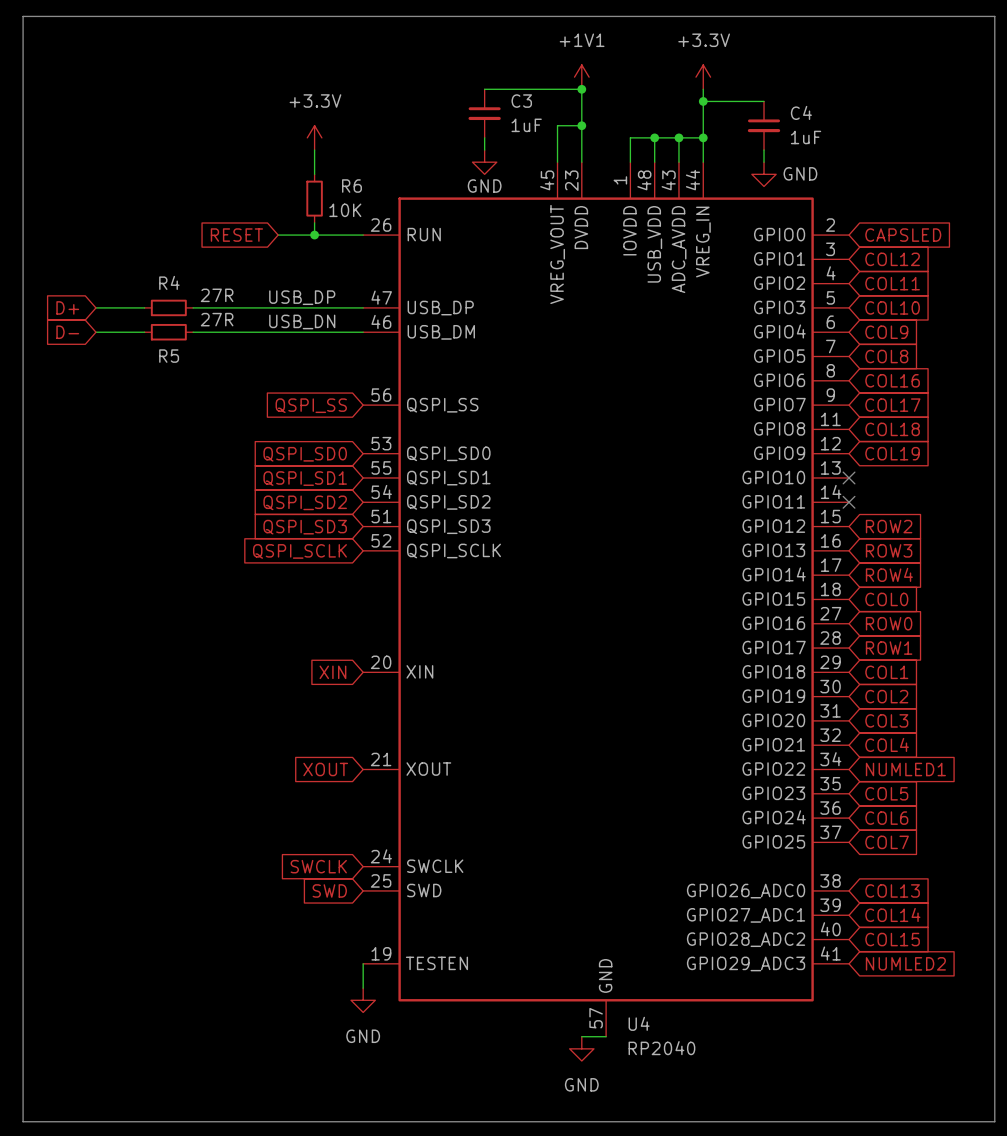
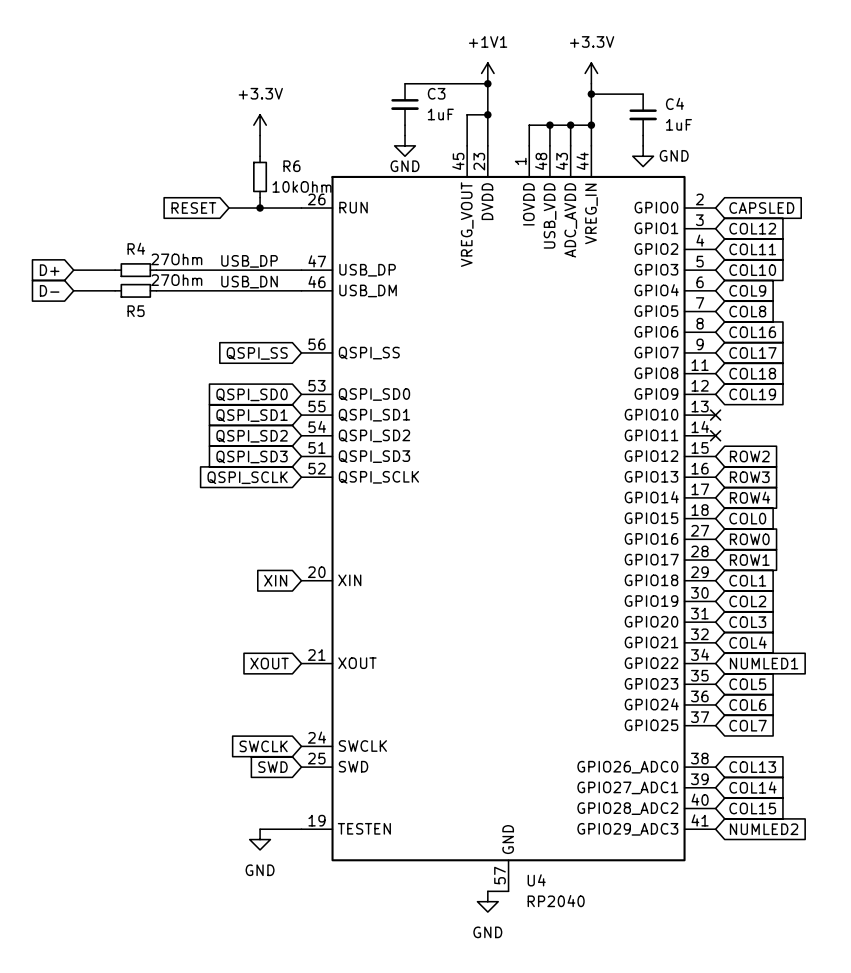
line: (23, 16) (994, 16) (994, 1121) (23, 1121) (23, 16) -> none
R6 value: 10K (345, 210) -> 10kOhm (302, 186)
R4 value: 27R (217, 295) -> 27Ohm (176, 259)
R5 value: 27R (217, 319) -> 27Ohm (176, 280)
wire: (363, 963) (363, 988) -> (301, 829) (260, 829)
power symbol position: GND (363, 1000) -> GND (260, 839)

